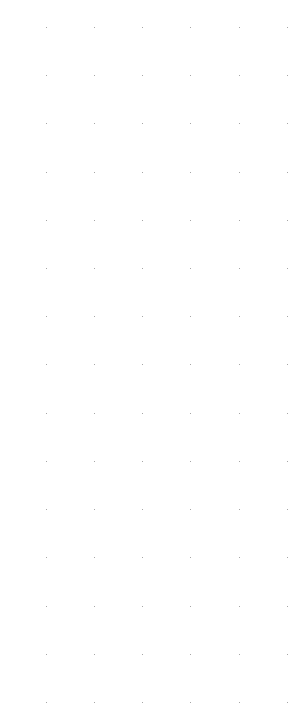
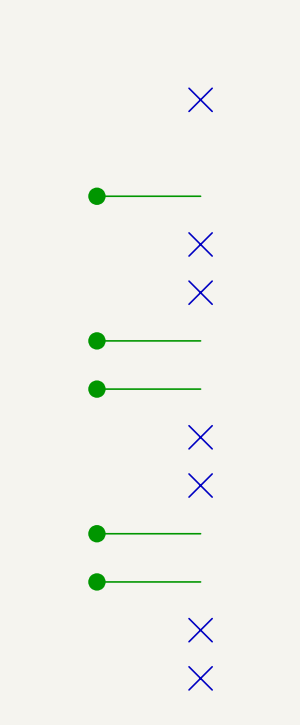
no-connect mark: none -> (200, 99)
wire: none -> (96, 196) (200, 196)
junction: none -> (96, 196)
no-connect mark: none -> (200, 244)
no-connect mark: none -> (200, 292)
wire: none -> (96, 340) (200, 340)
junction: none -> (96, 340)
wire: none -> (96, 389) (200, 389)
junction: none -> (96, 389)
no-connect mark: none -> (200, 437)
no-connect mark: none -> (200, 485)
wire: none -> (96, 533) (200, 533)
junction: none -> (96, 533)
wire: none -> (96, 581) (200, 581)
junction: none -> (96, 581)
no-connect mark: none -> (200, 630)
no-connect mark: none -> (200, 678)

